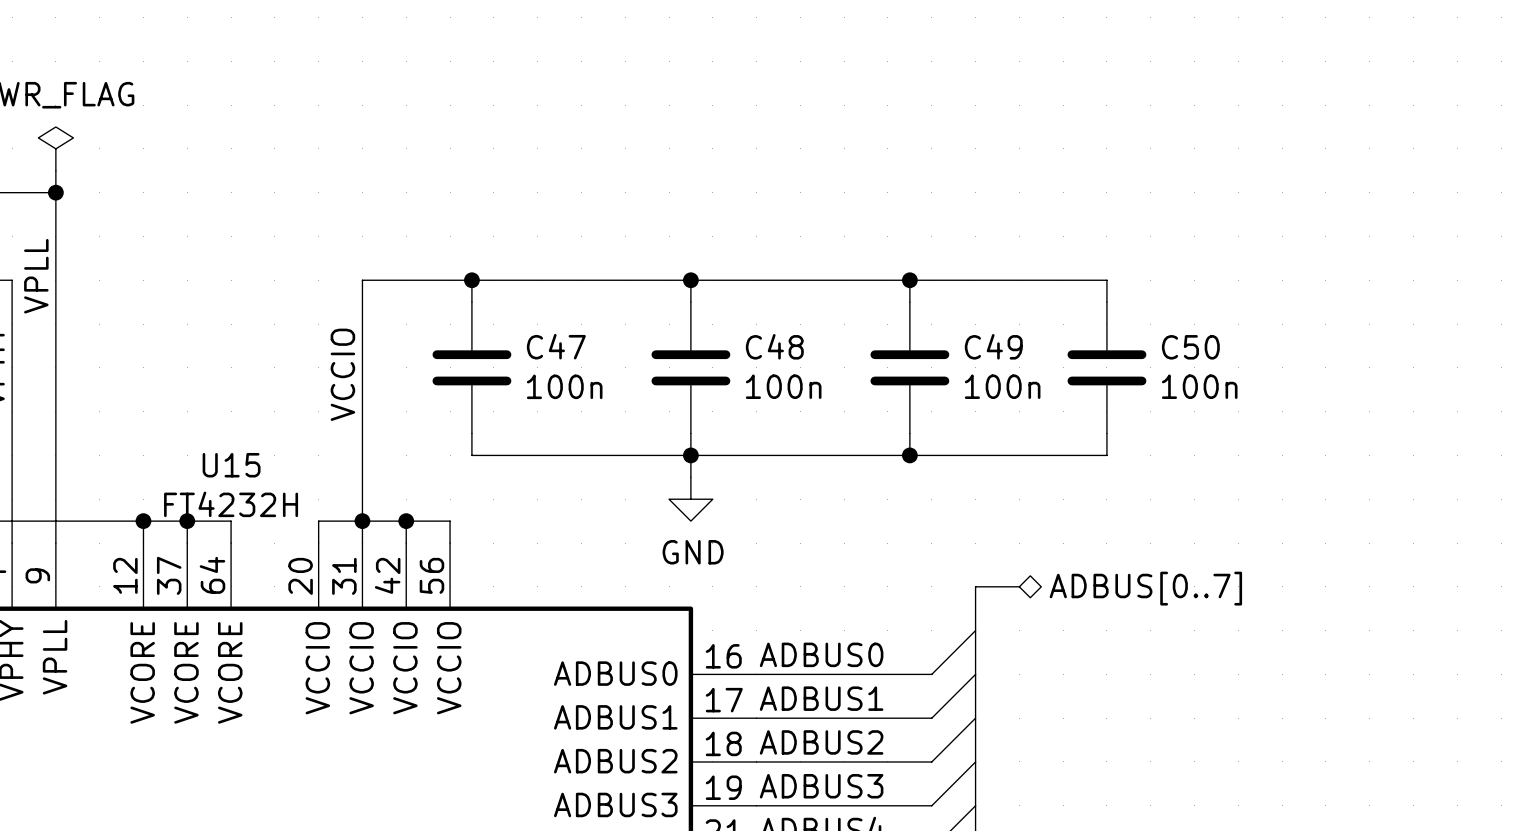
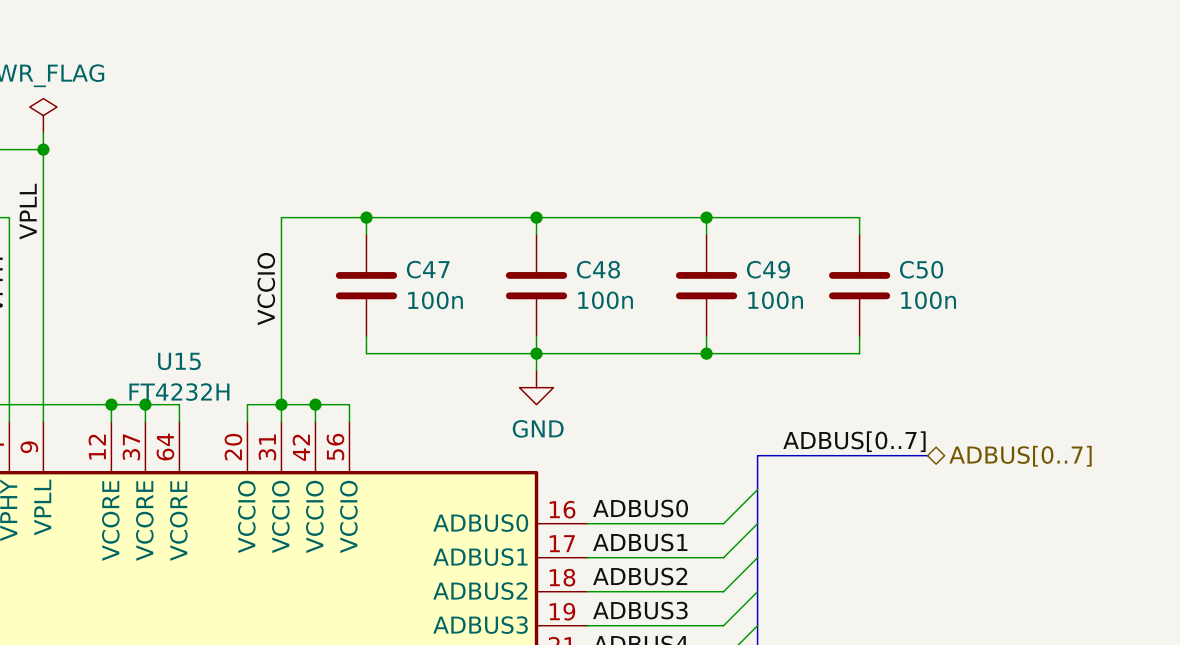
label: none -> ADBUS[0..7] (854, 441)
bus: none -> (791, 455) (927, 455)
hierarchical label position: ADBUS[0..7] (1145, 588) -> ADBUS[0..7] (1020, 456)

